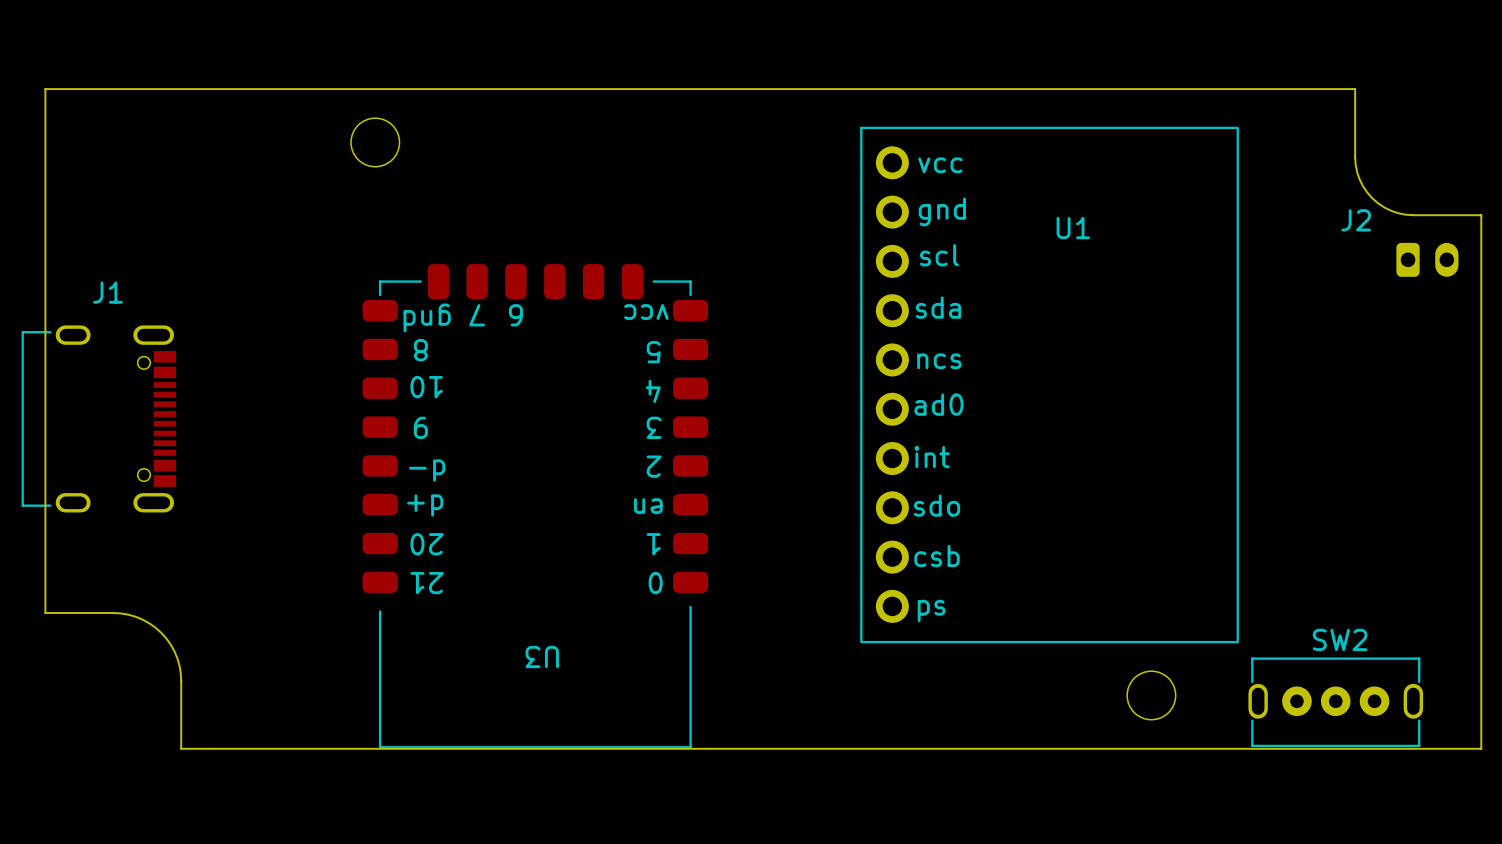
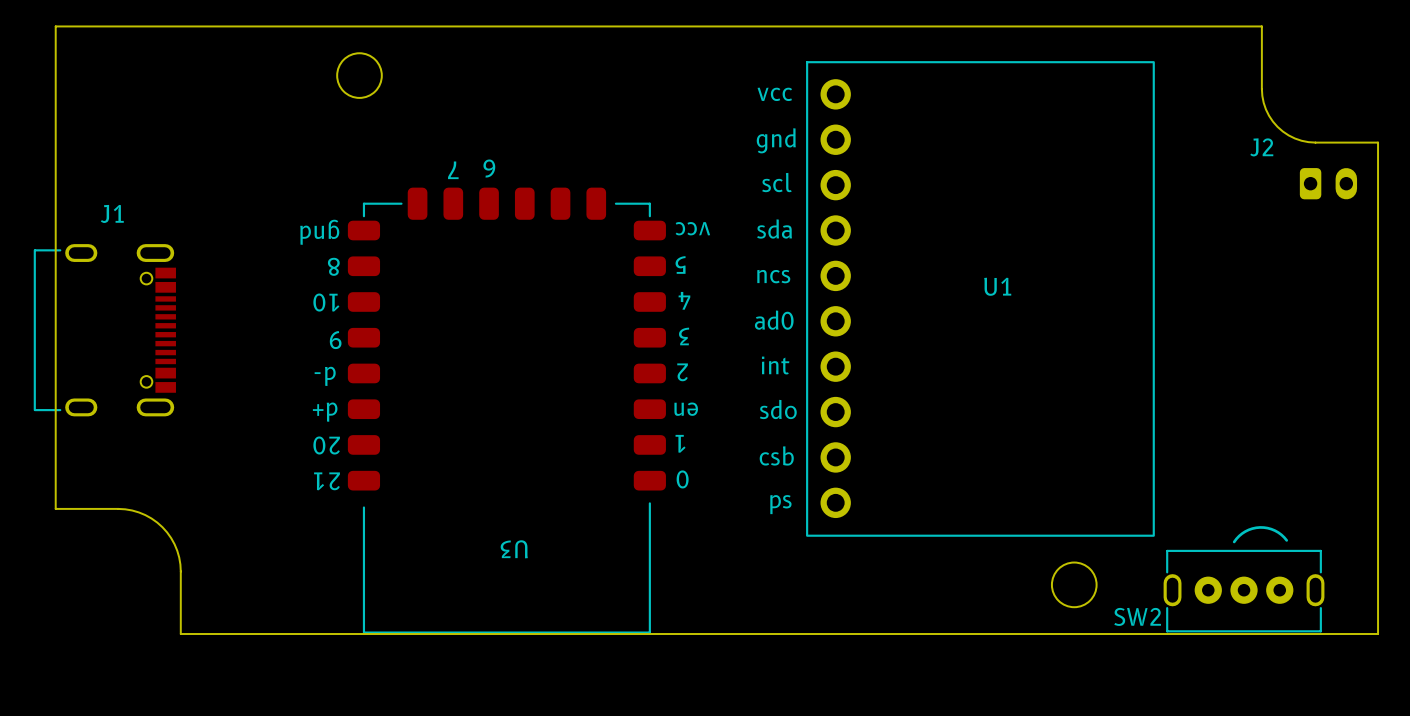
U1 footprint: [860, 126, 1239, 644] -> [806, 61, 1155, 537]
U1 name position: U1 (1073, 228) -> U1 (997, 286)
U3 footprint: [362, 264, 709, 749] -> [347, 187, 666, 634]
SW2 name position: SW2 (1340, 639) -> SW2 (1137, 616)
line: none -> (1286, 540) (1274, 530) (1260, 527) (1245, 531) (1234, 541)

